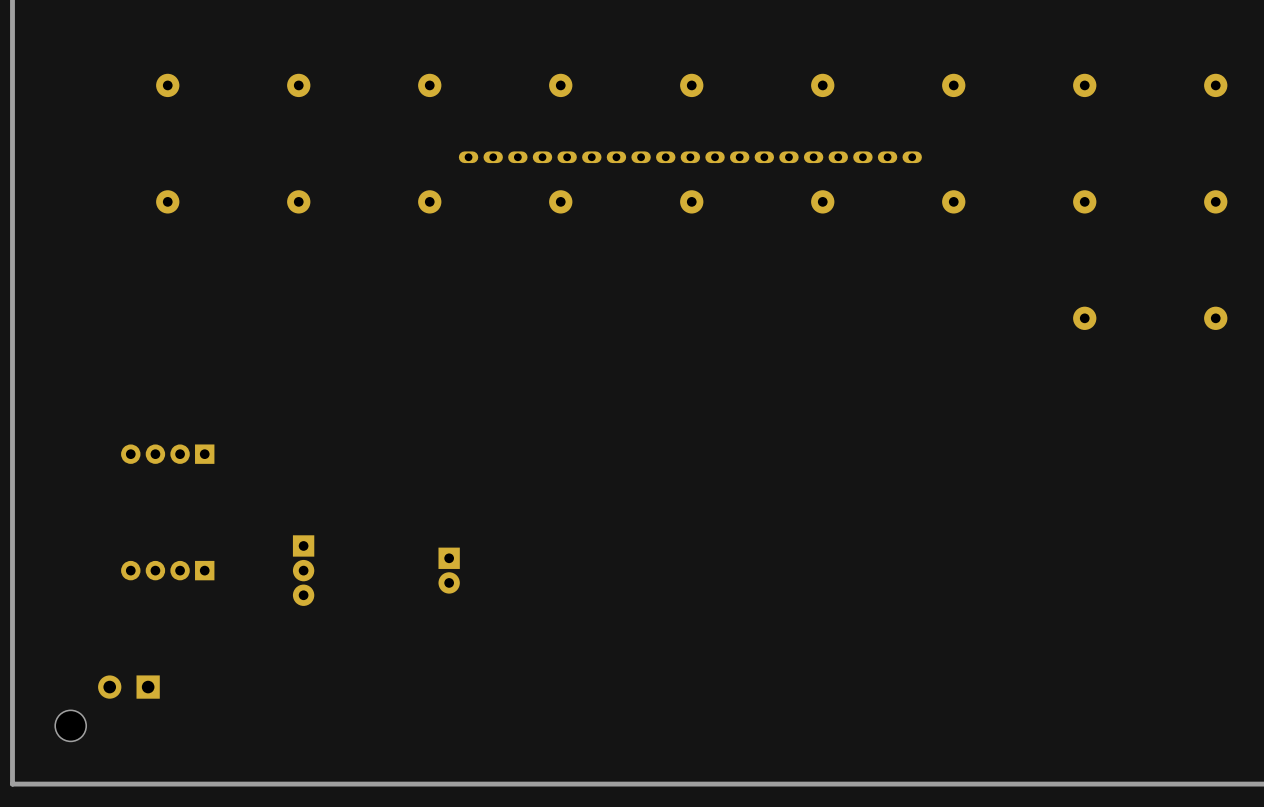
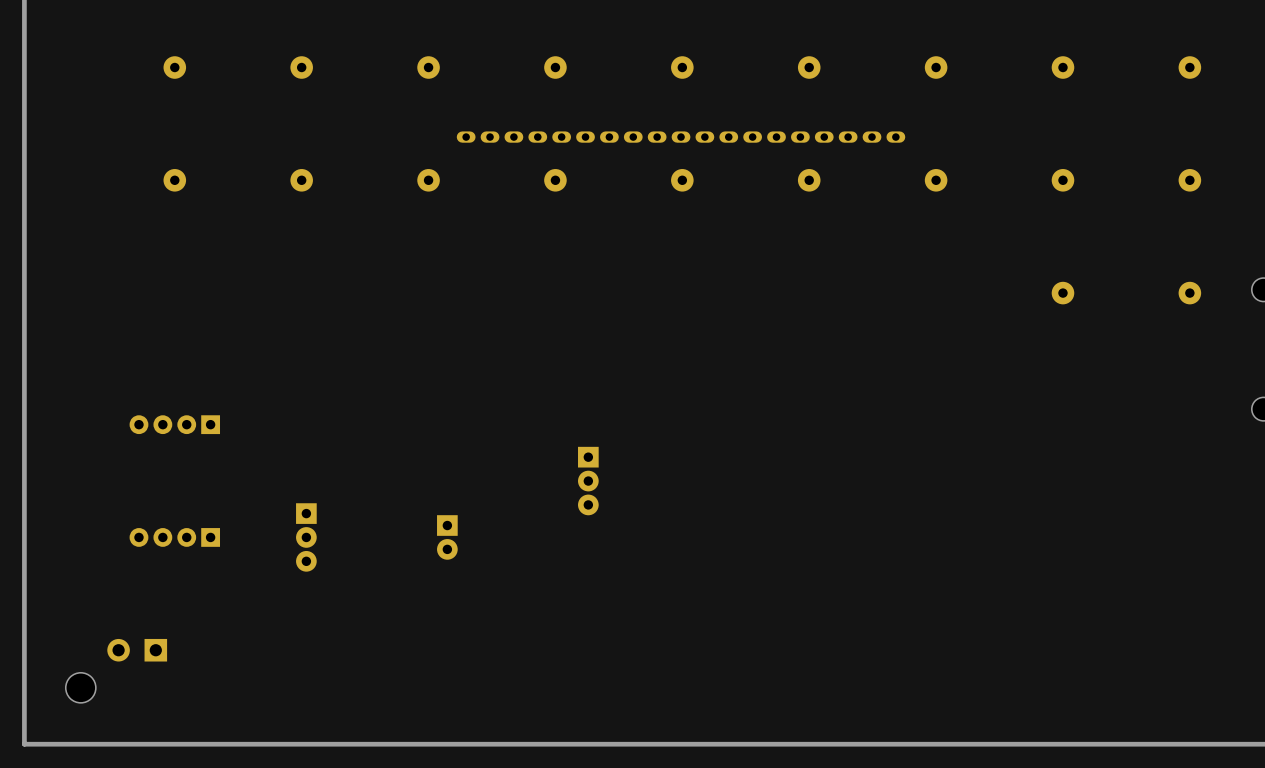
part: none -> (588, 481)

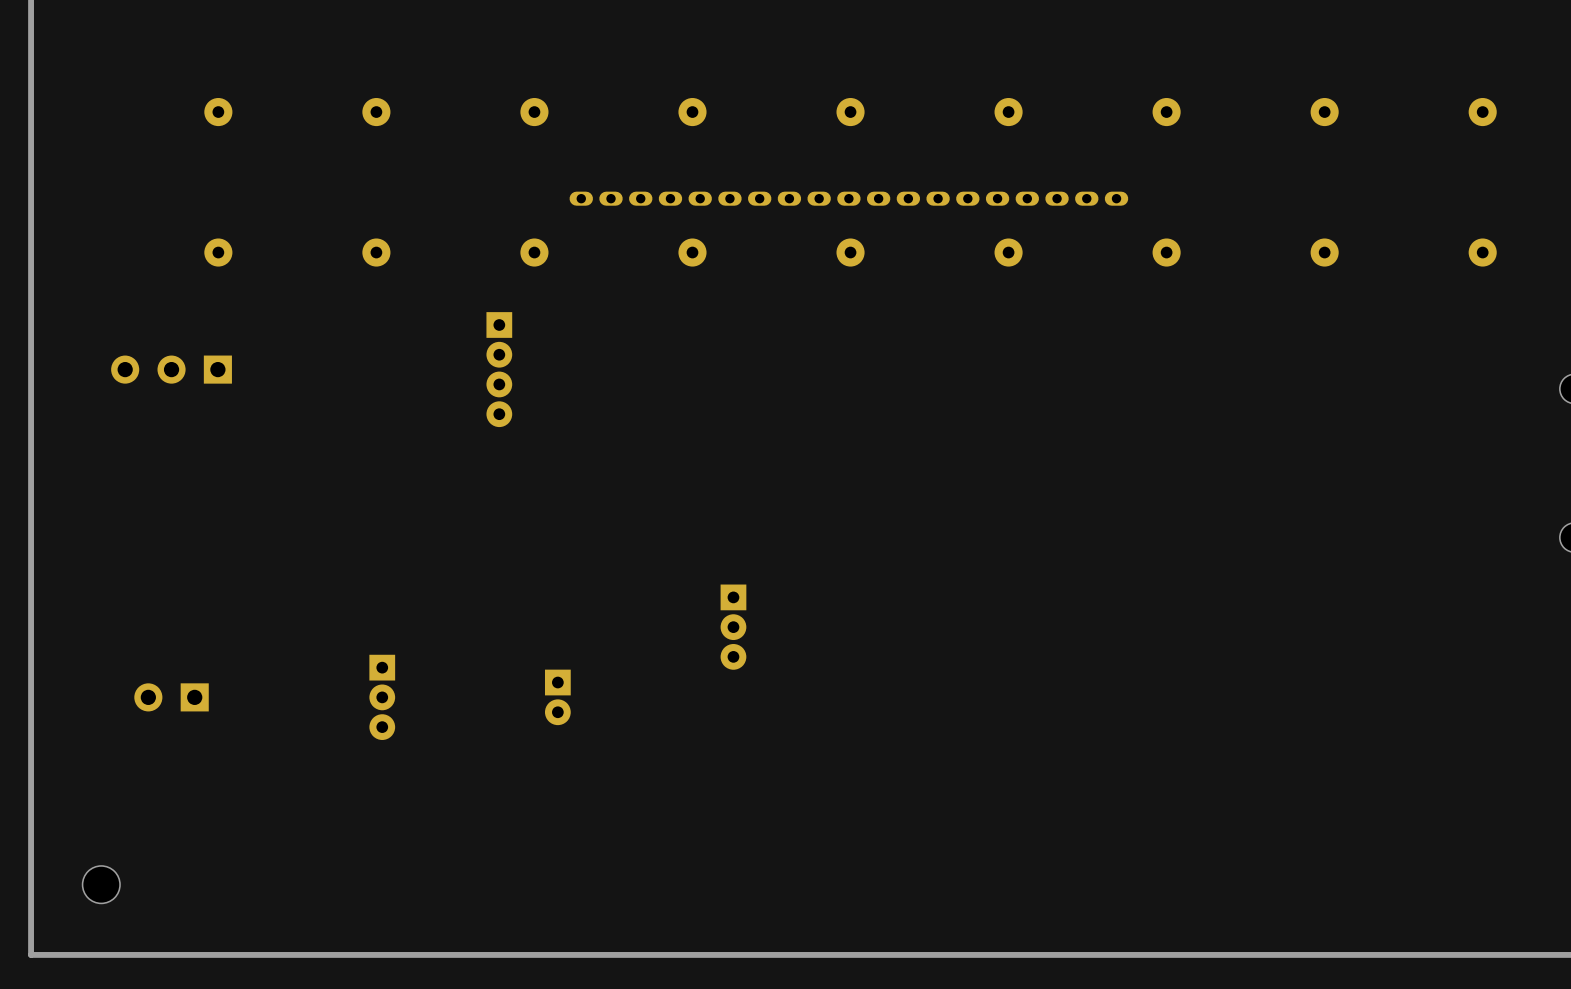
part: none -> (171, 369)
part: none -> (499, 369)
part: (1062, 293) -> none
part: (1189, 293) -> none
part: (174, 424) -> none
part: (174, 537) -> none
part position: (137, 650) -> (171, 697)

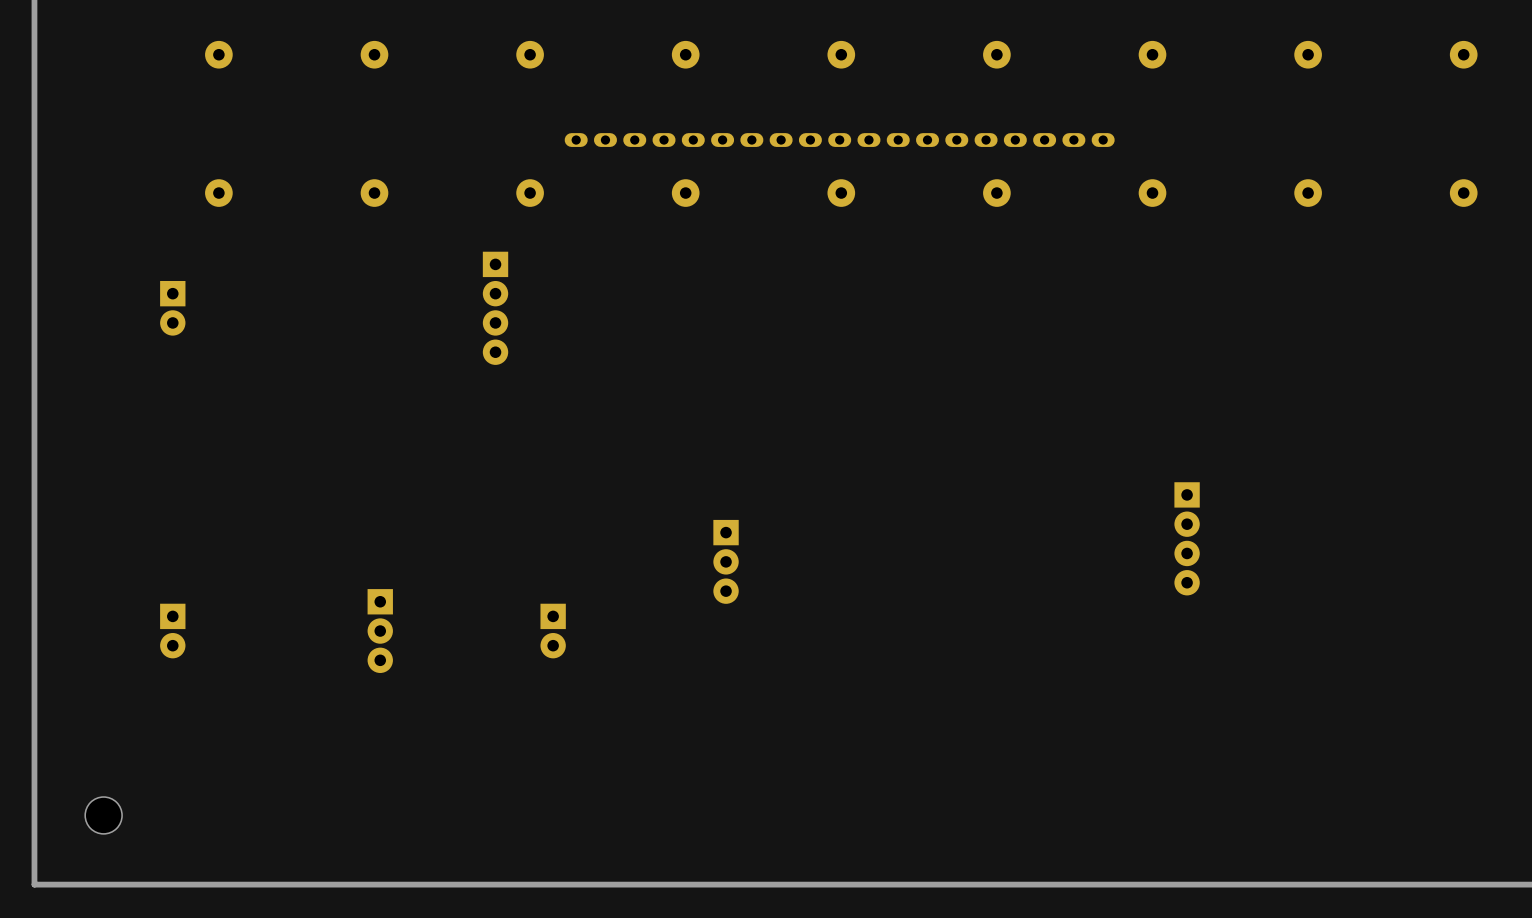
part footprint: [111, 355, 232, 384] -> [160, 280, 186, 336]
part: none -> (1187, 538)
part footprint: [134, 683, 209, 712] -> [160, 603, 186, 659]

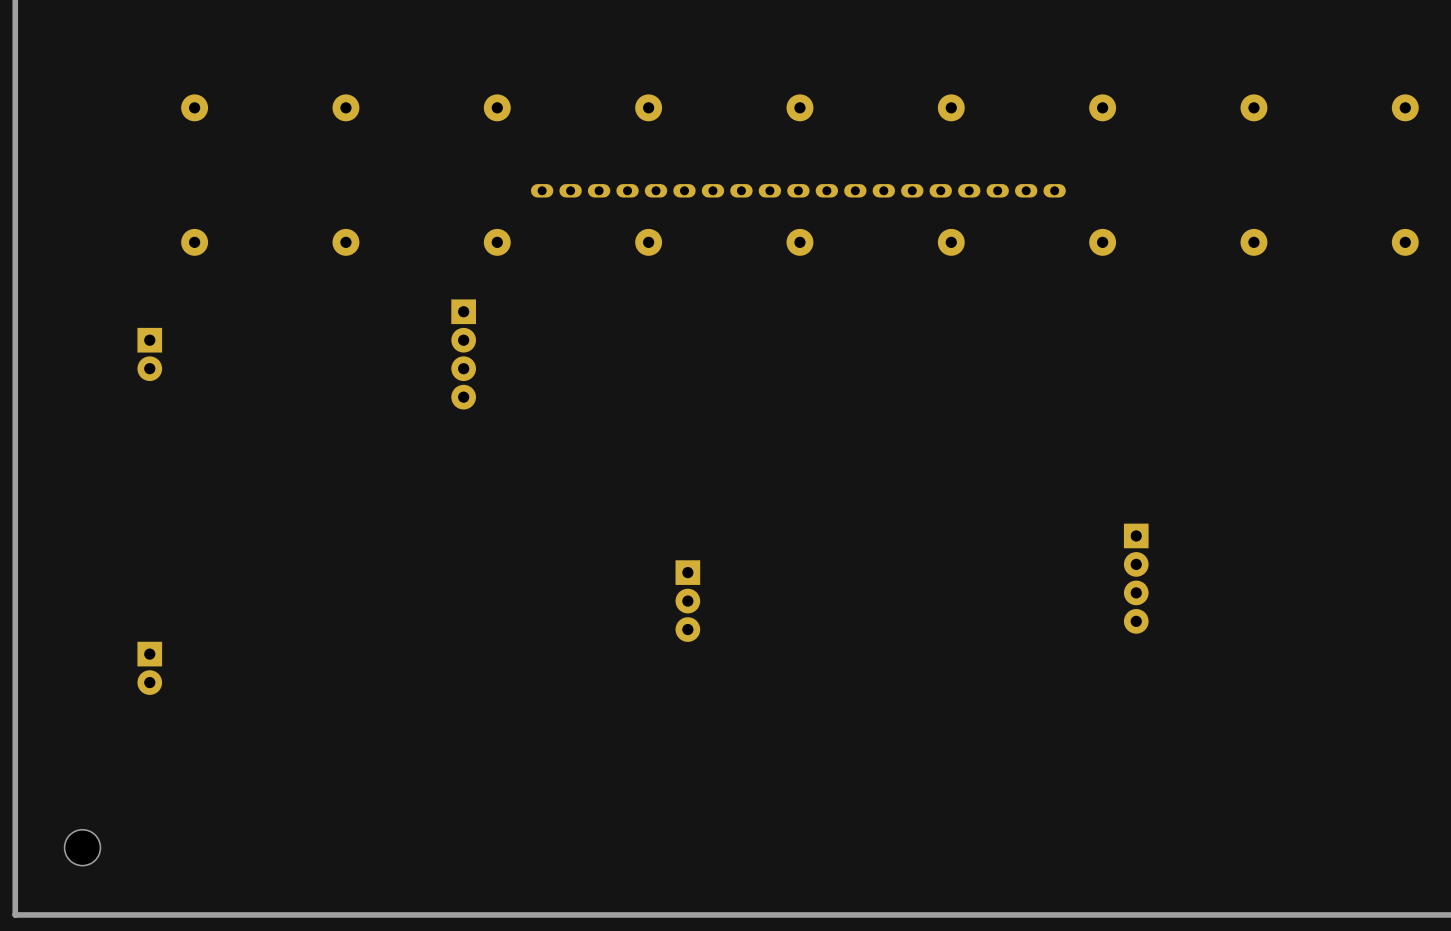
part: (380, 631) -> none
part: (553, 631) -> none

